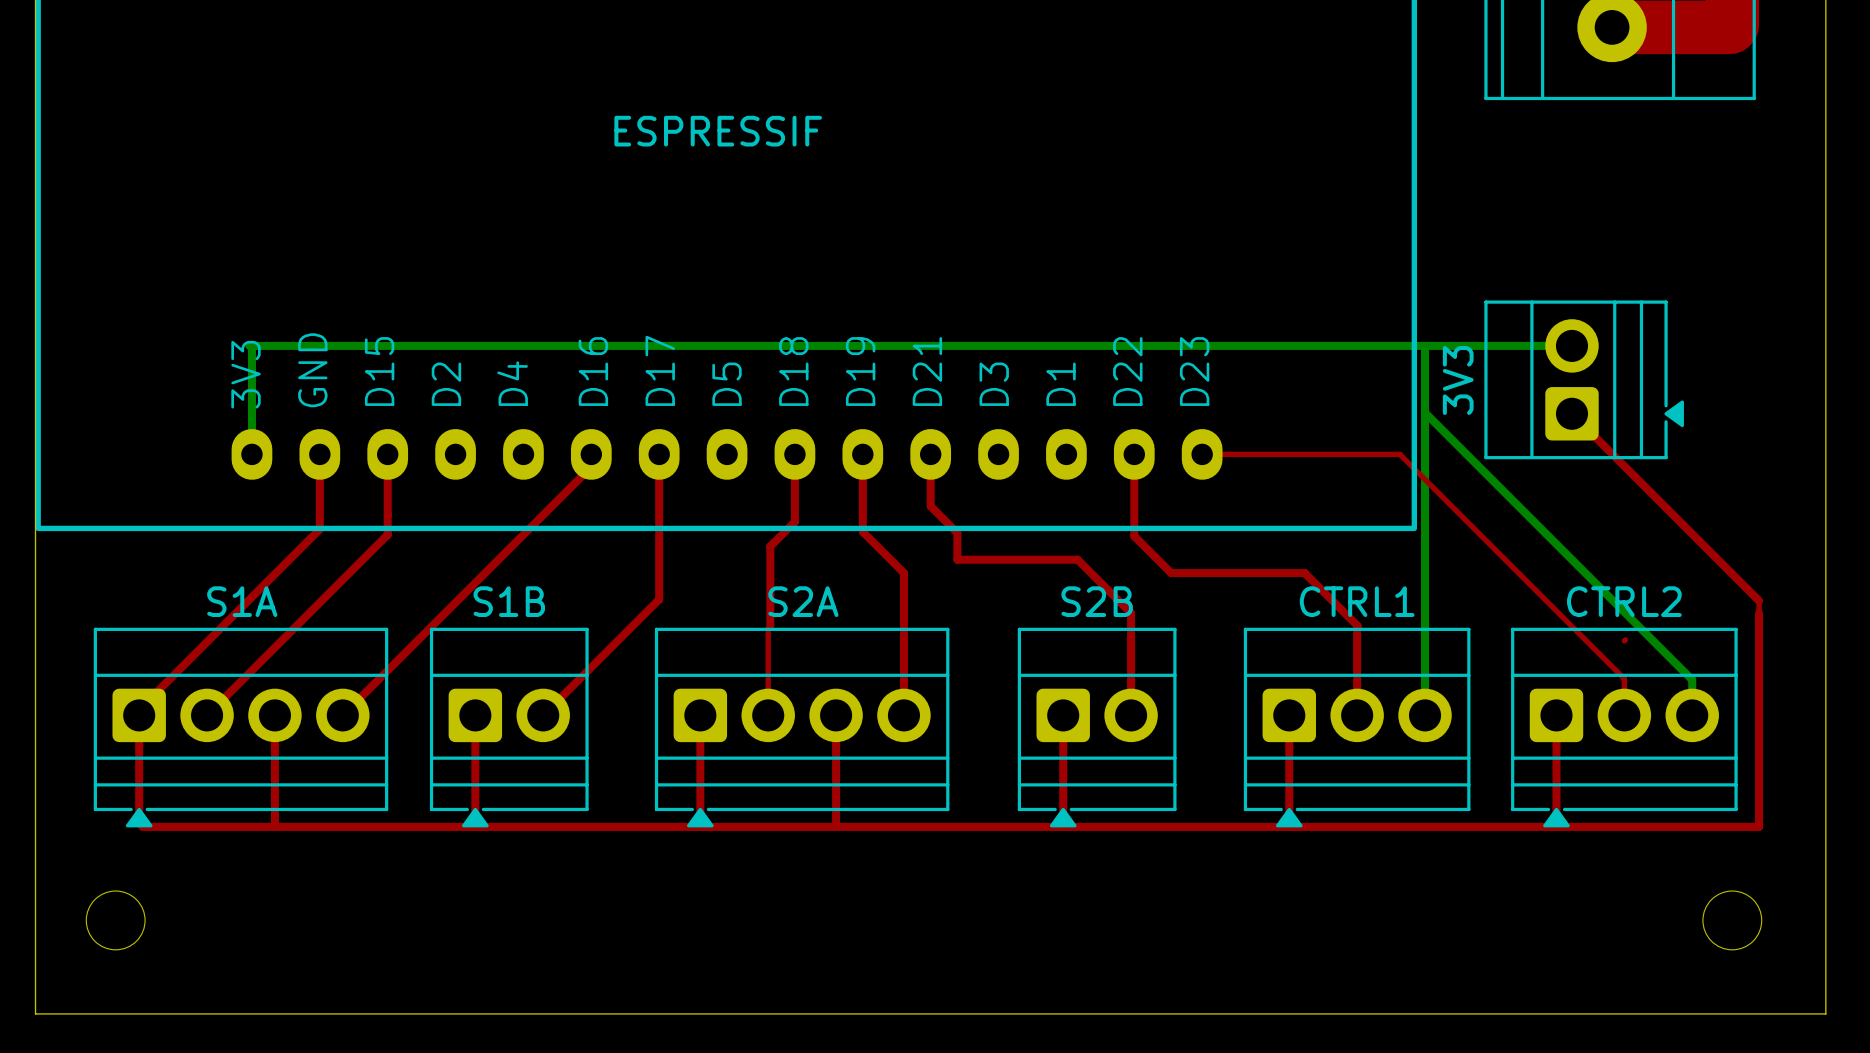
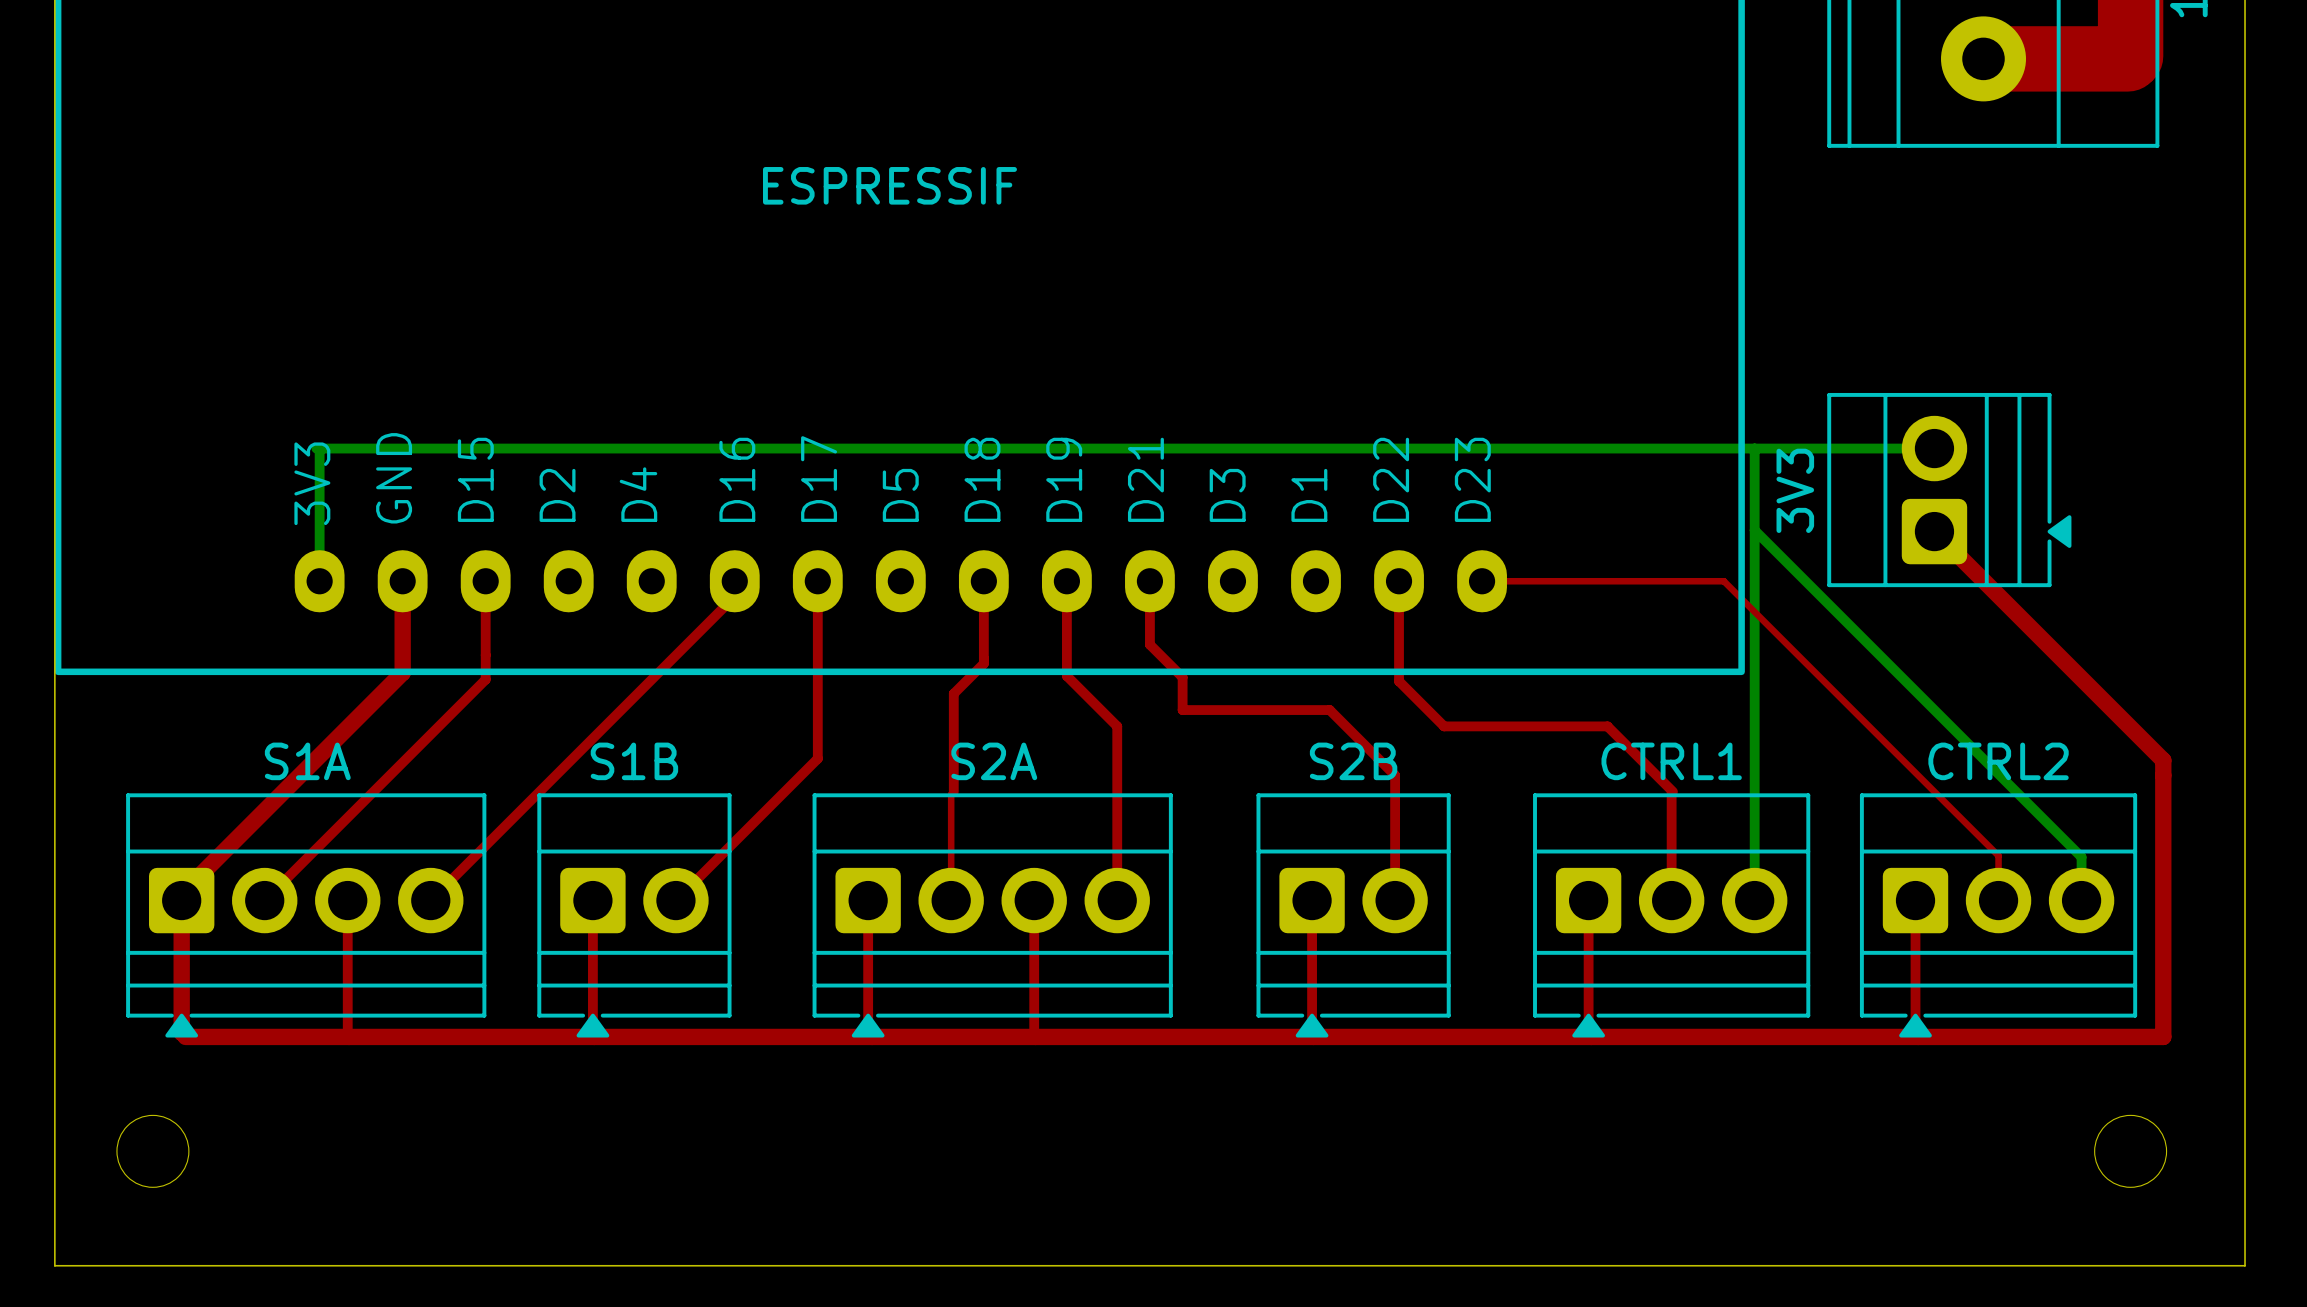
top track width: thin (1571, 413) (1759, 600) (1759, 826) (142, 826) -> thick (1934, 531) (2163, 760) (2163, 1036) (185, 1036)
top track width: thin (319, 454) (319, 529) (139, 709) -> thick (402, 581) (402, 672) (181, 893)
top track: (1625, 639) (1624, 640) -> none
top track width: thin (139, 715) (139, 823) -> thick (181, 900) (181, 1033)

